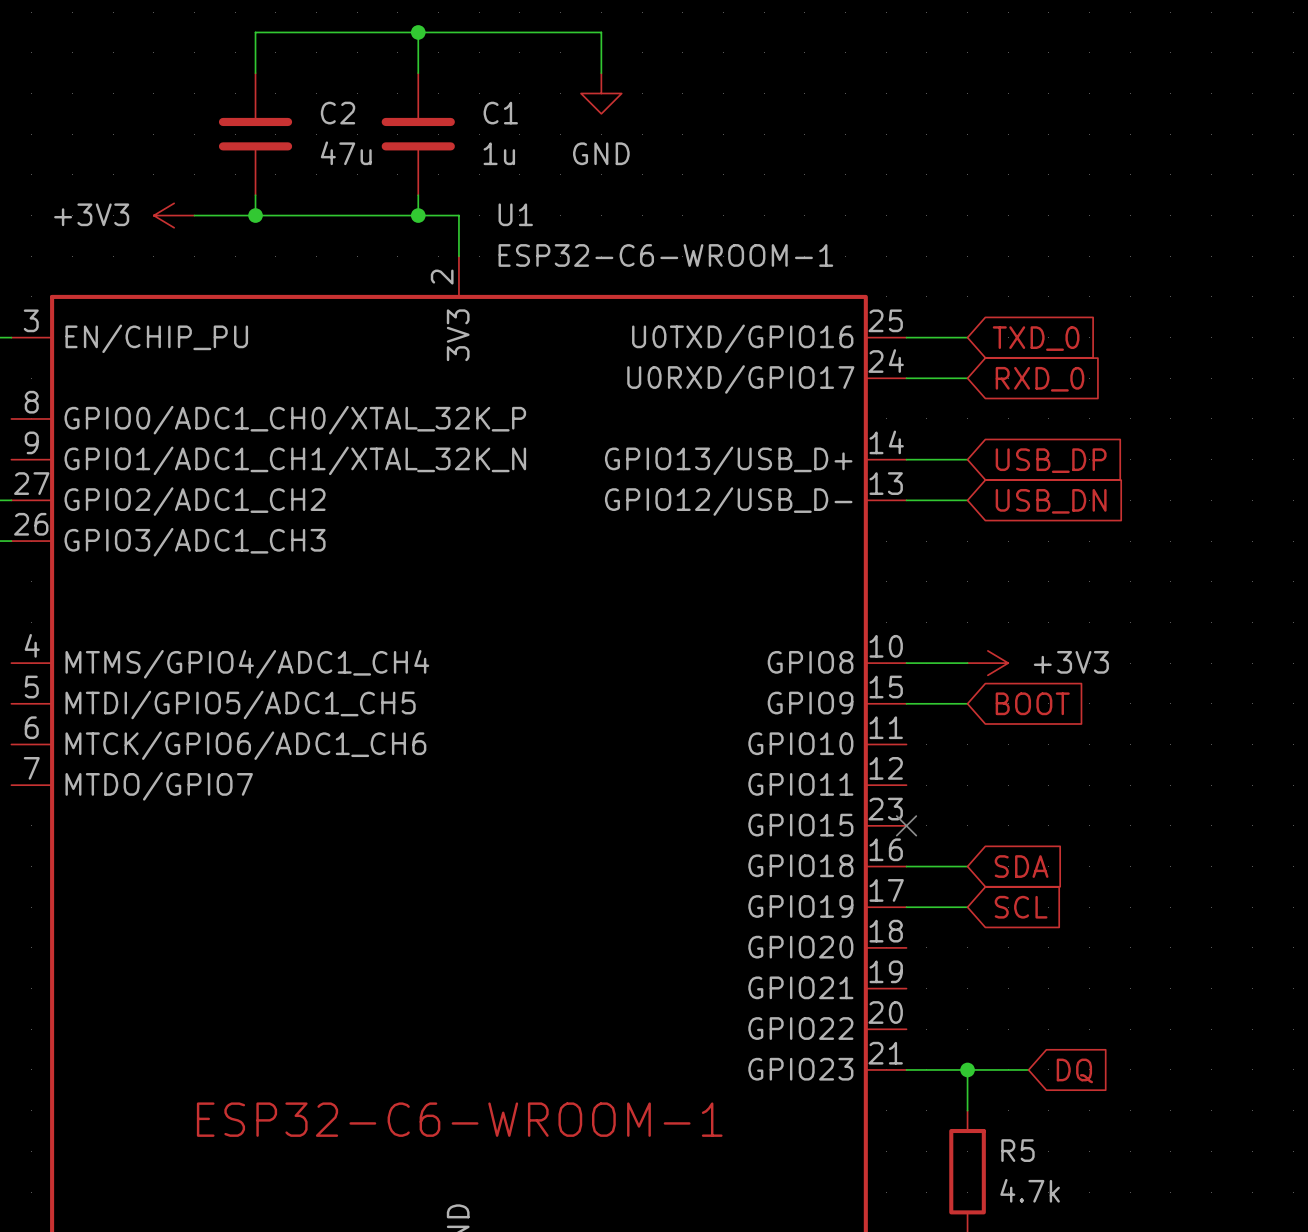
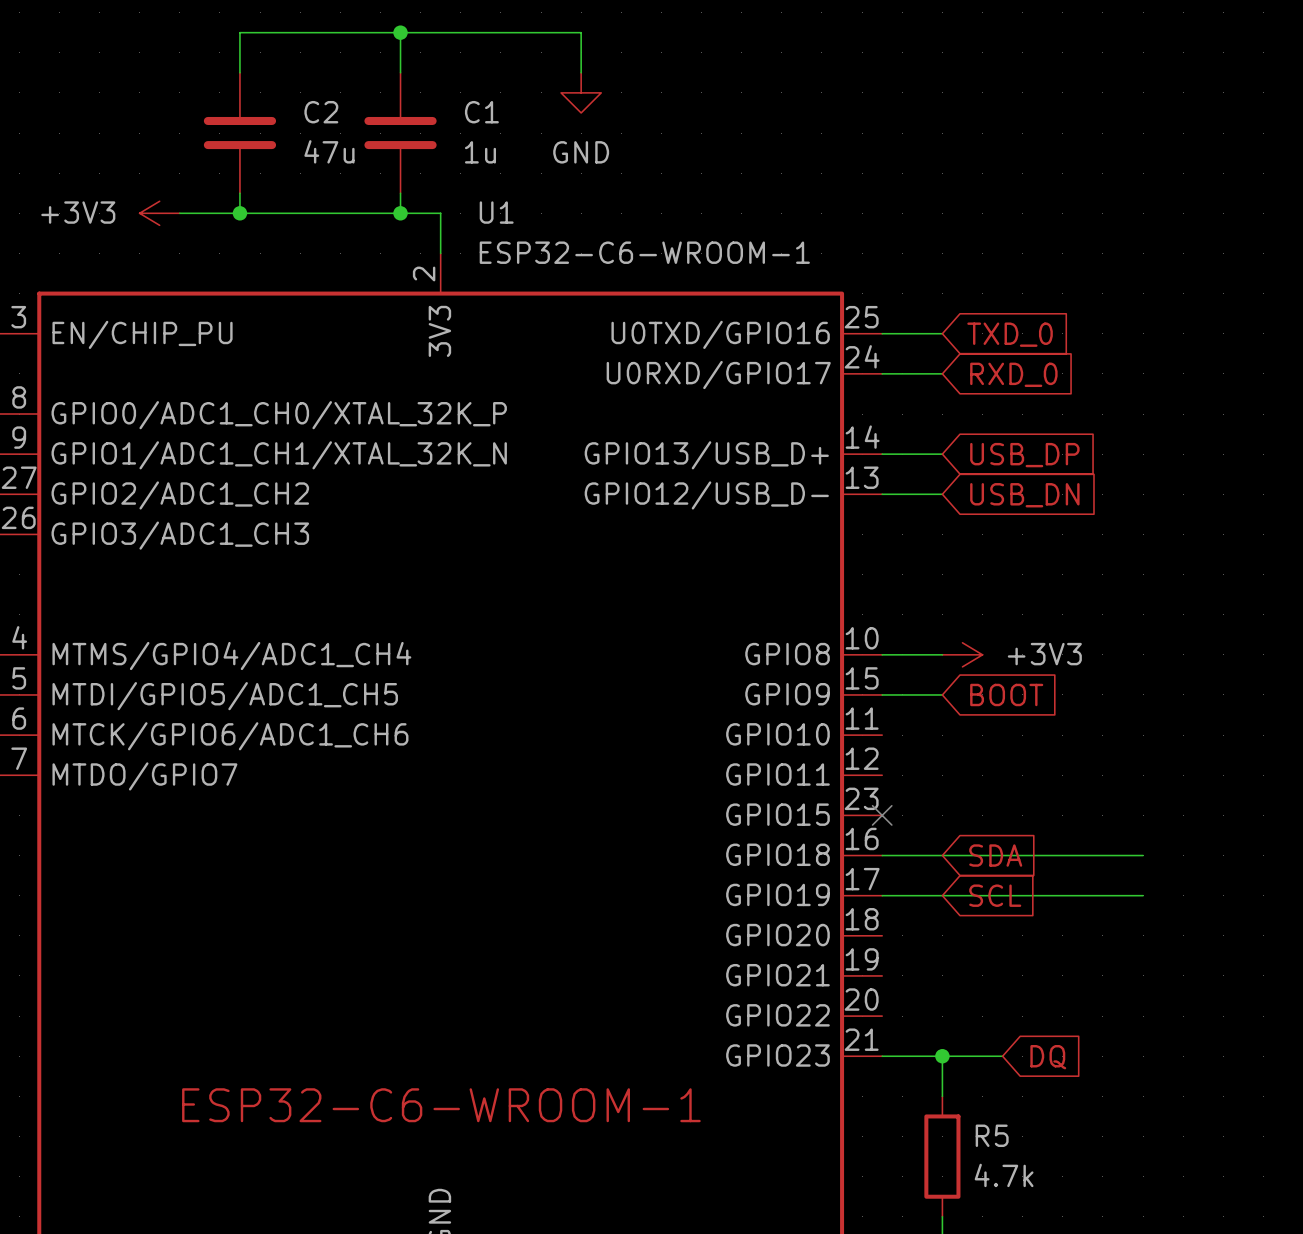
wire: none -> (942, 855) (1143, 855)
wire: none -> (942, 895) (1143, 895)

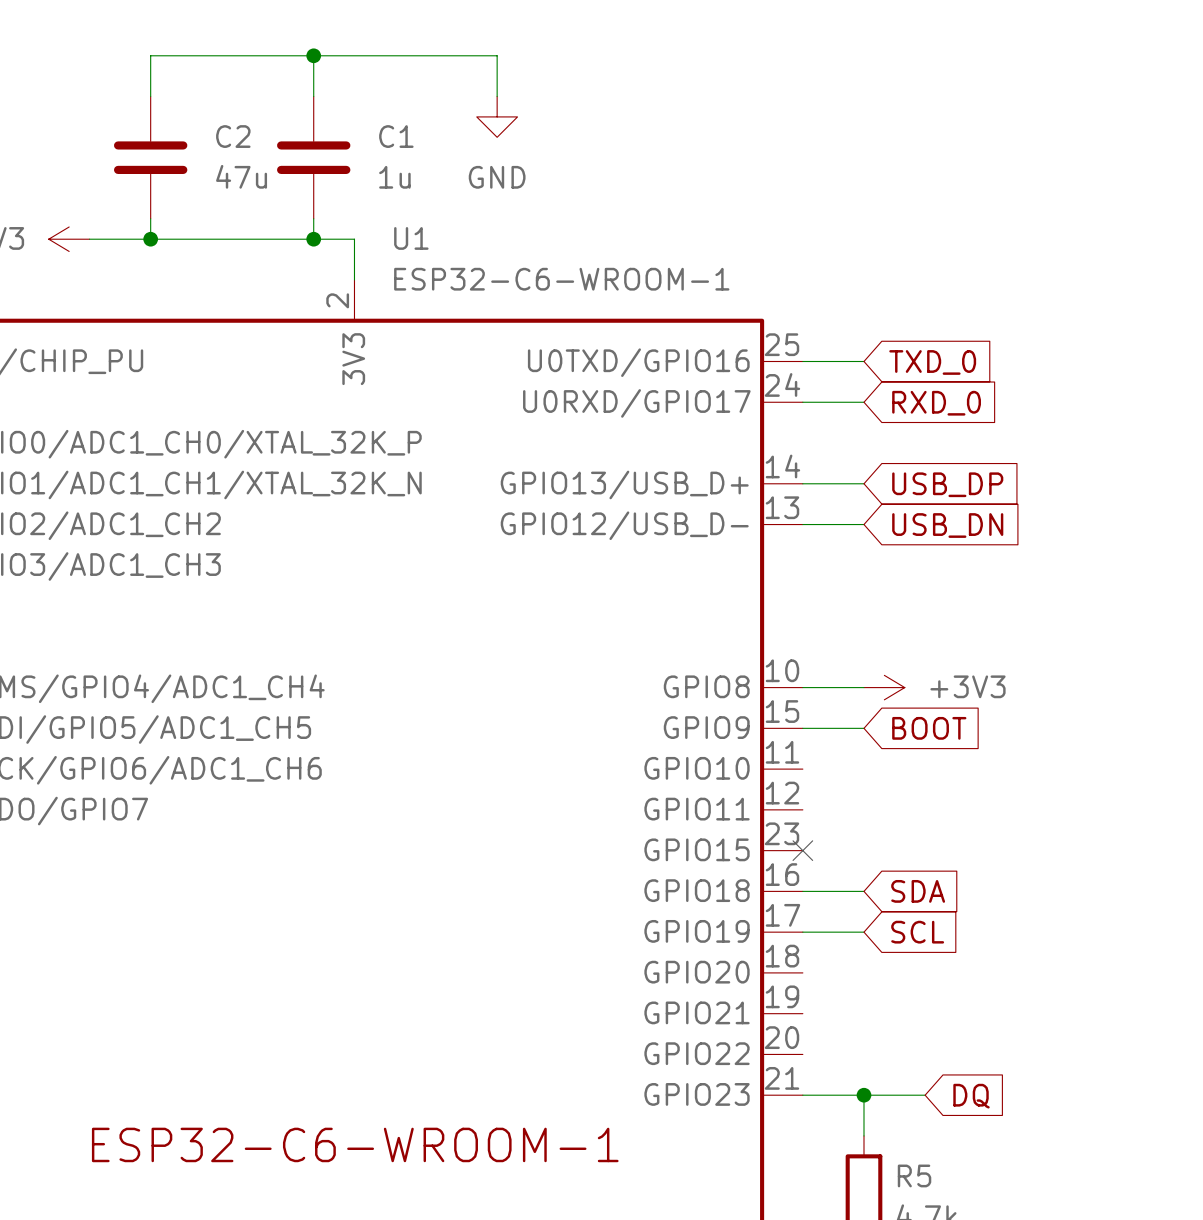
wire: (942, 855) (1143, 855) -> none
wire: (942, 895) (1143, 895) -> none

